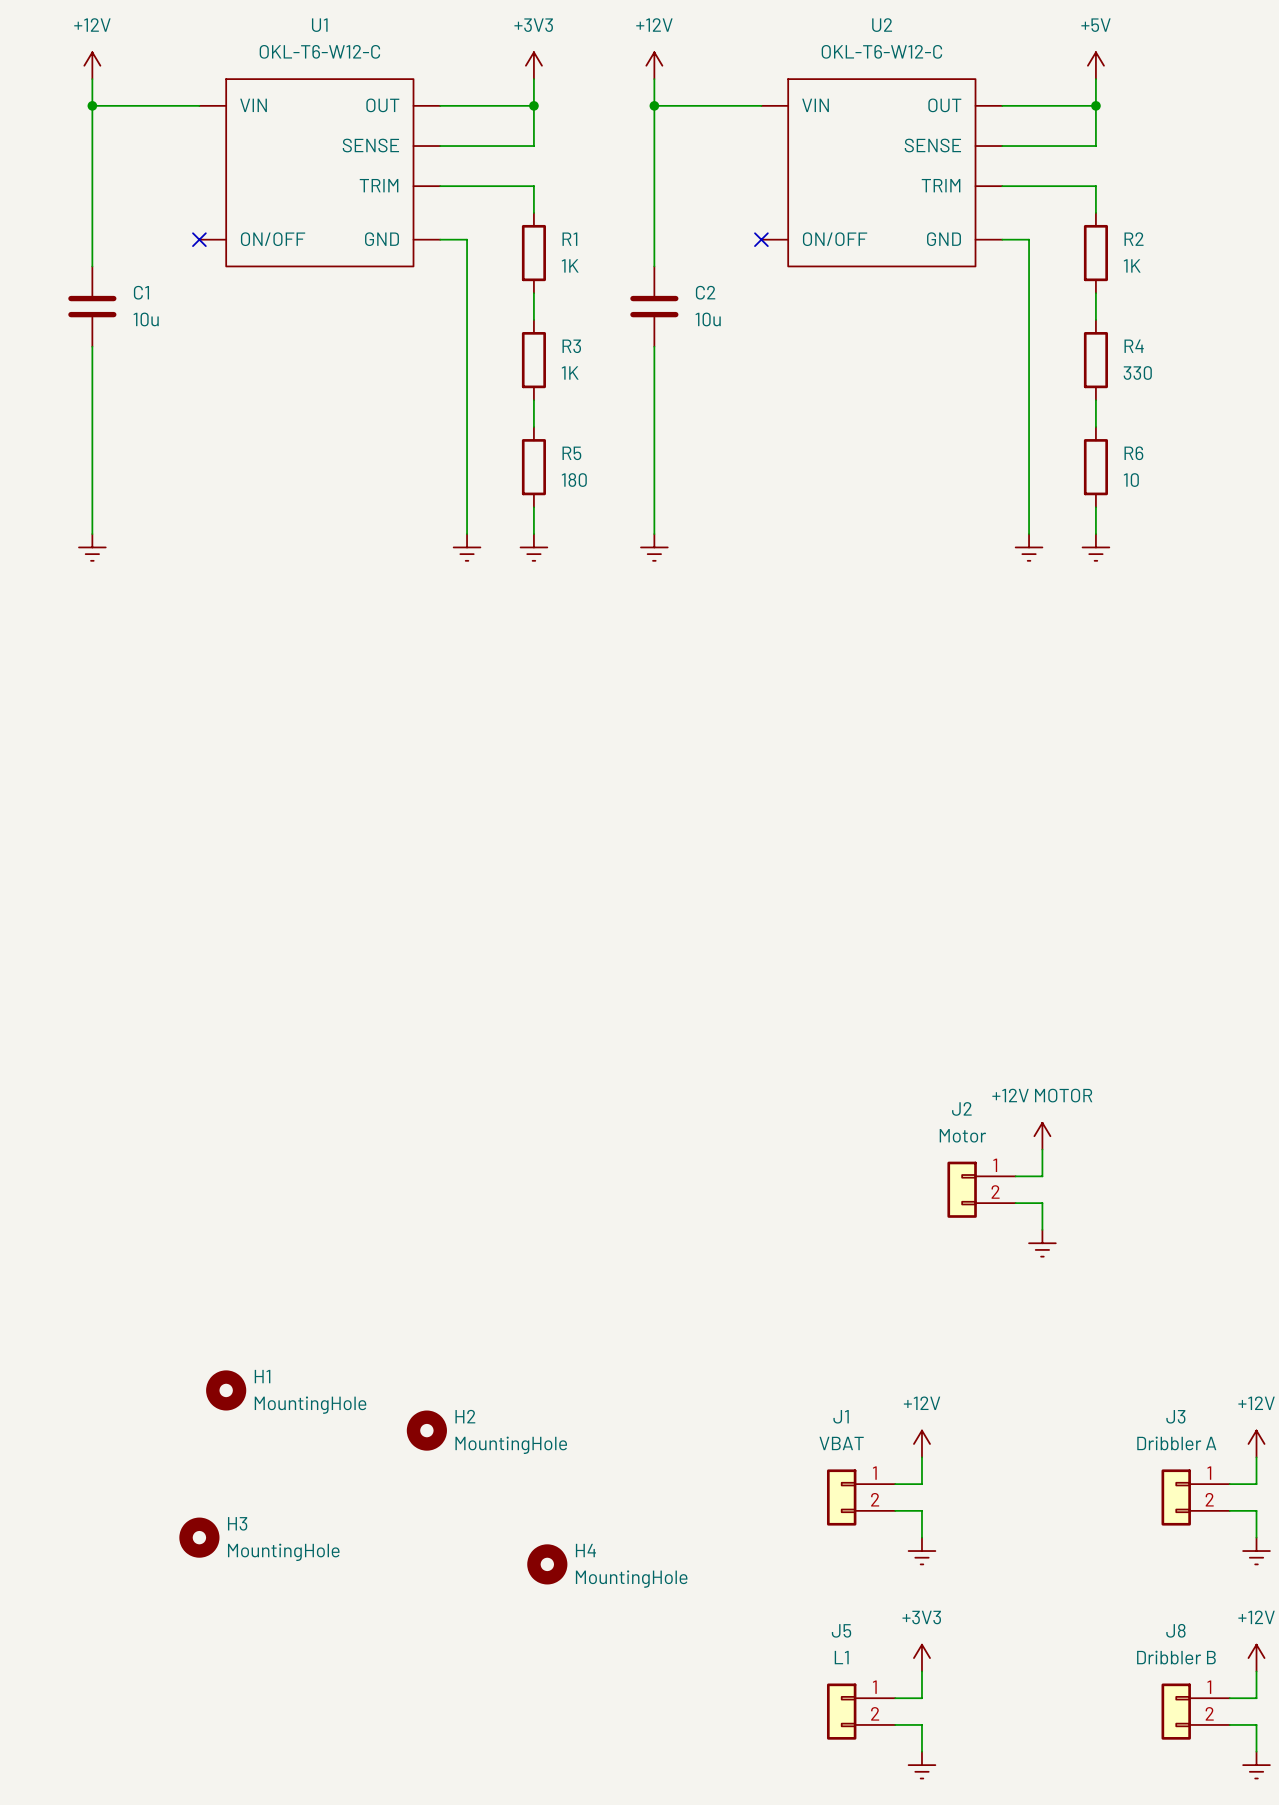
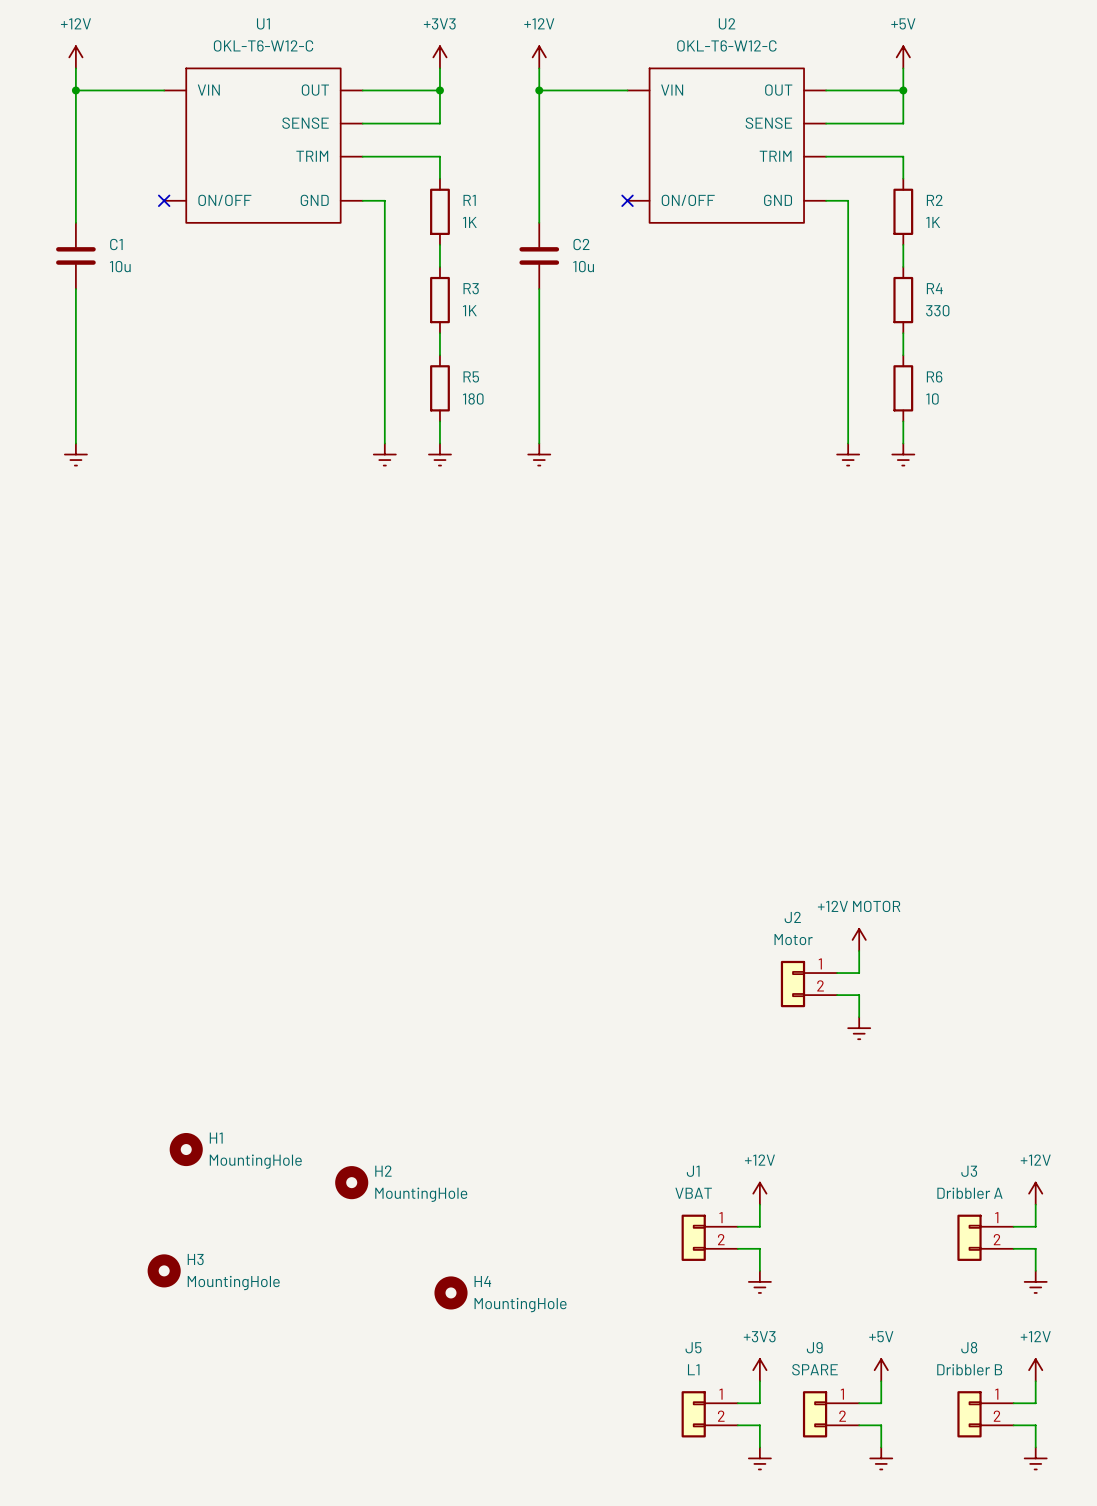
power symbol: none -> +5V (881, 1370)
wire: none -> (881, 1381) (881, 1403) (859, 1403)
J9: none -> SPARE (831, 1414)
wire: none -> (859, 1425) (881, 1425) (881, 1447)
power symbol: none -> (881, 1458)

